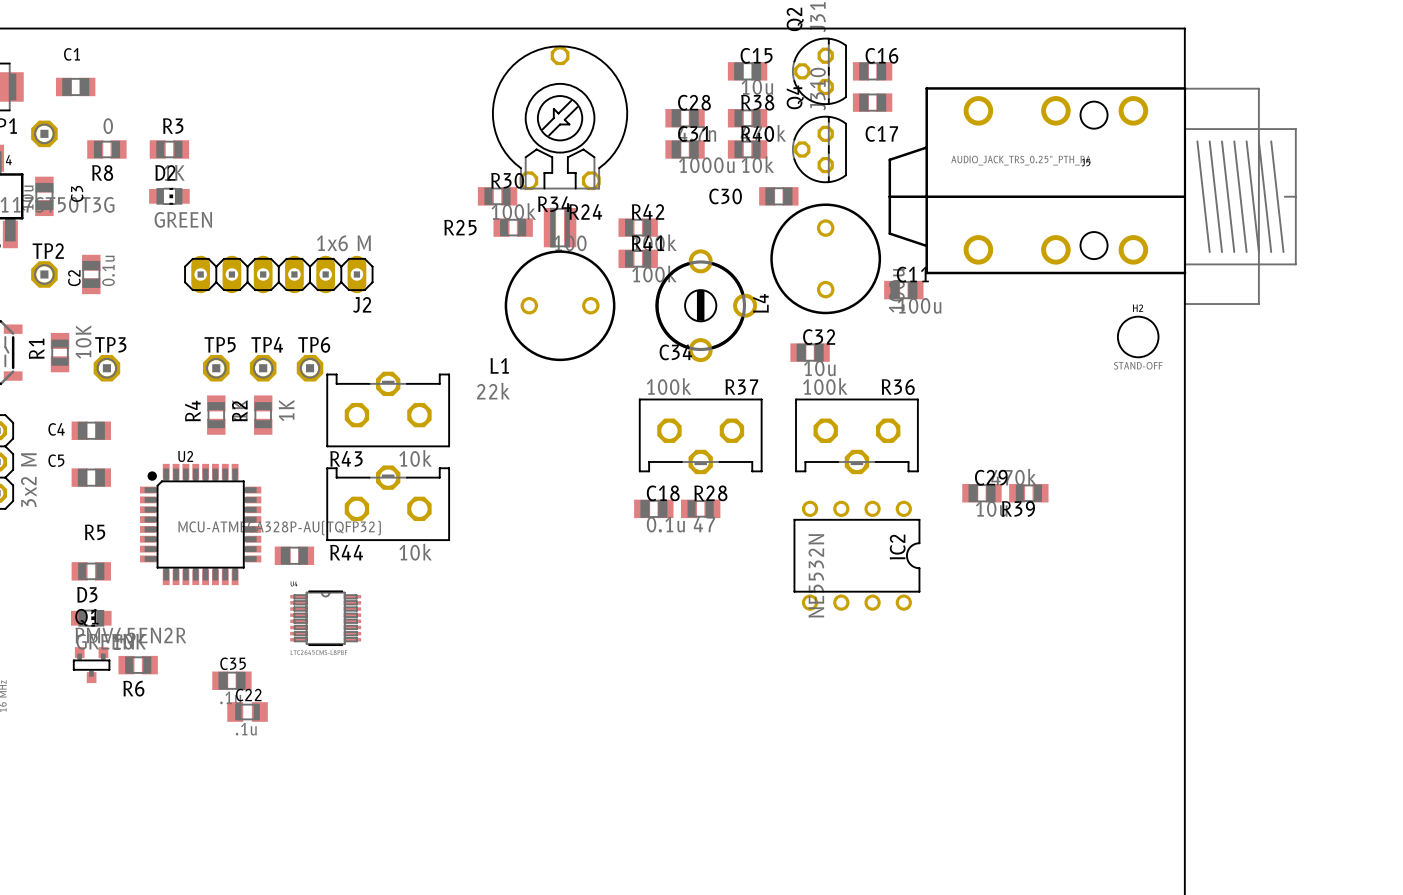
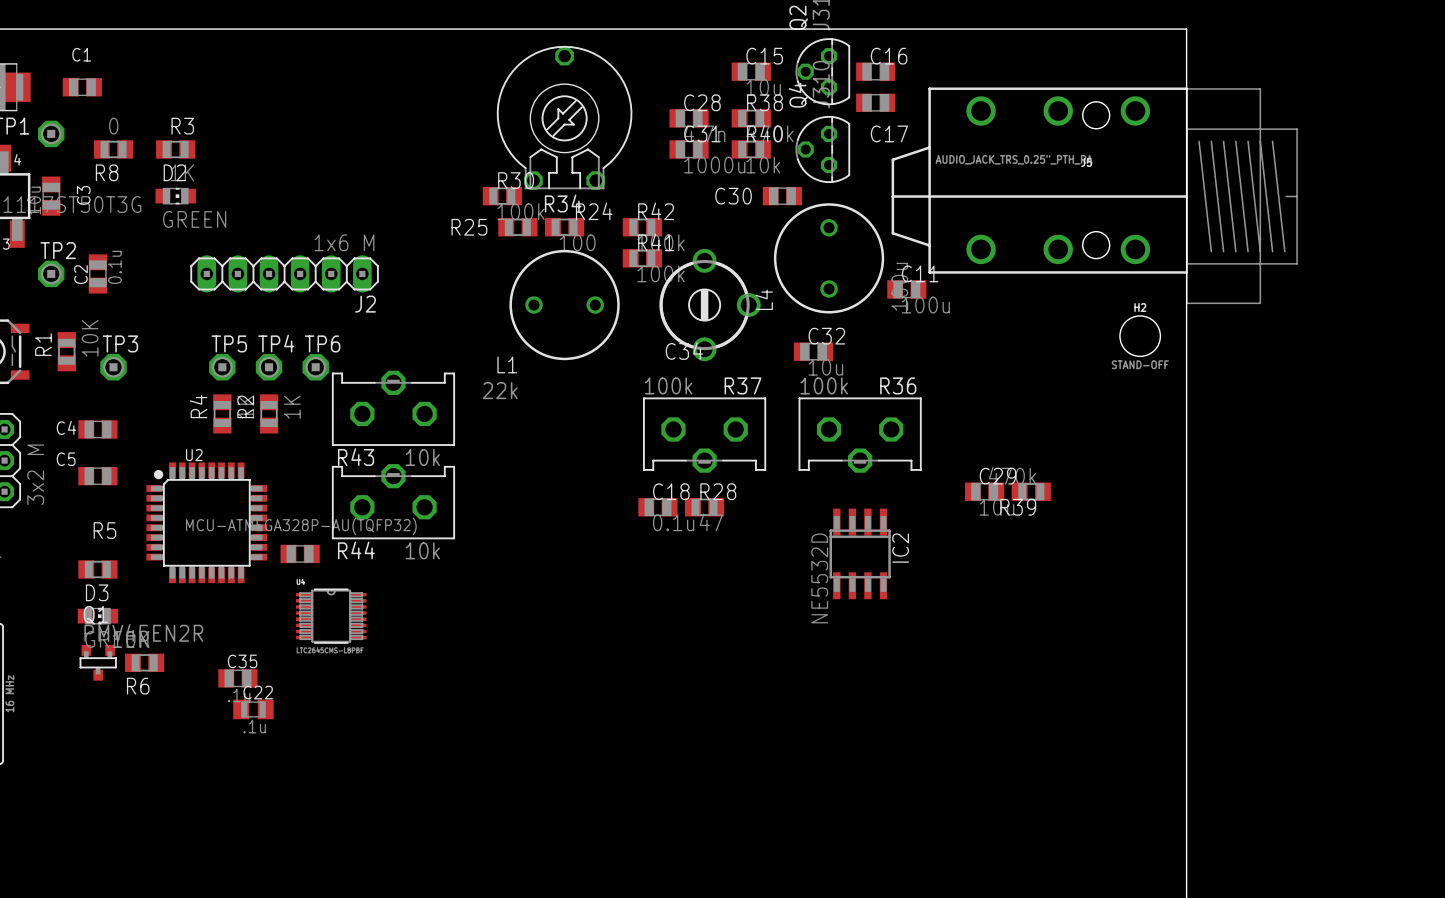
R24 footprint: [543, 207, 577, 248] -> [544, 218, 585, 237]
IC2 footprint: [793, 500, 921, 611] -> [829, 508, 891, 600]
IC2 value: NE5532N (816, 575) -> NE5532D (819, 578)

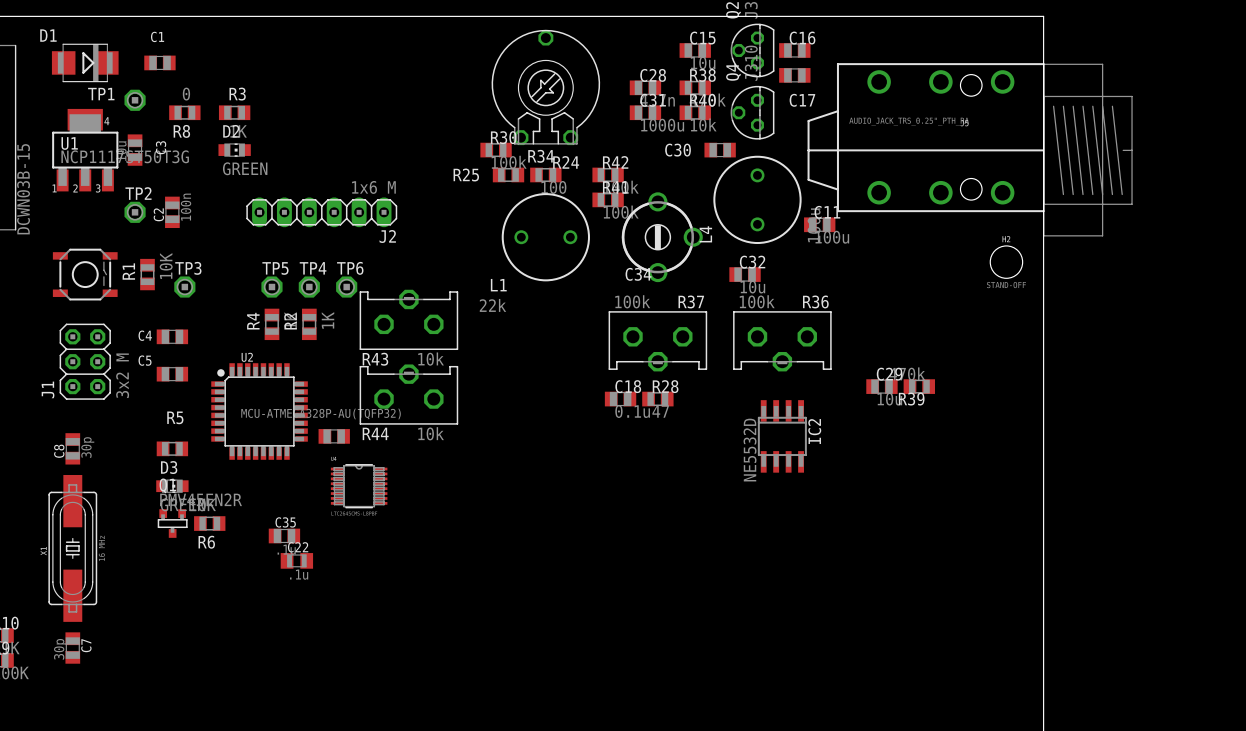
C2 value: 0.1u (114, 267) -> 100n (186, 207)

